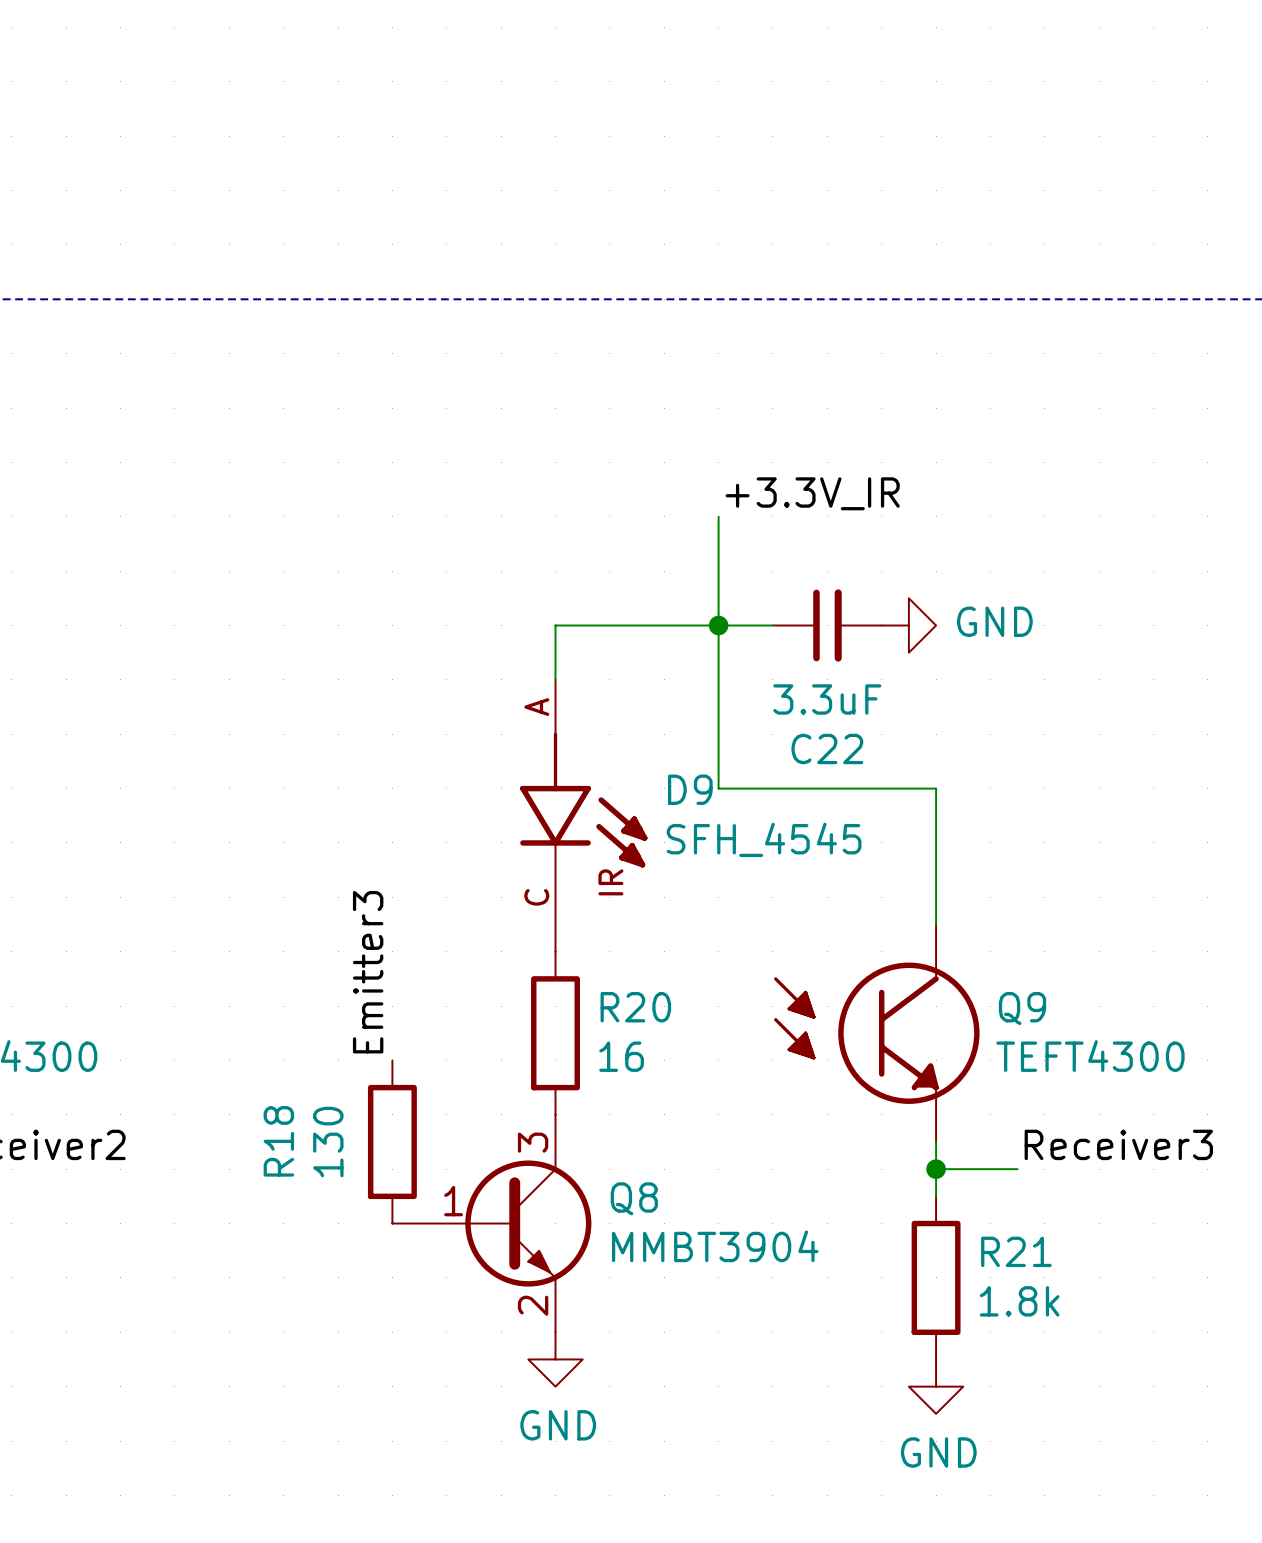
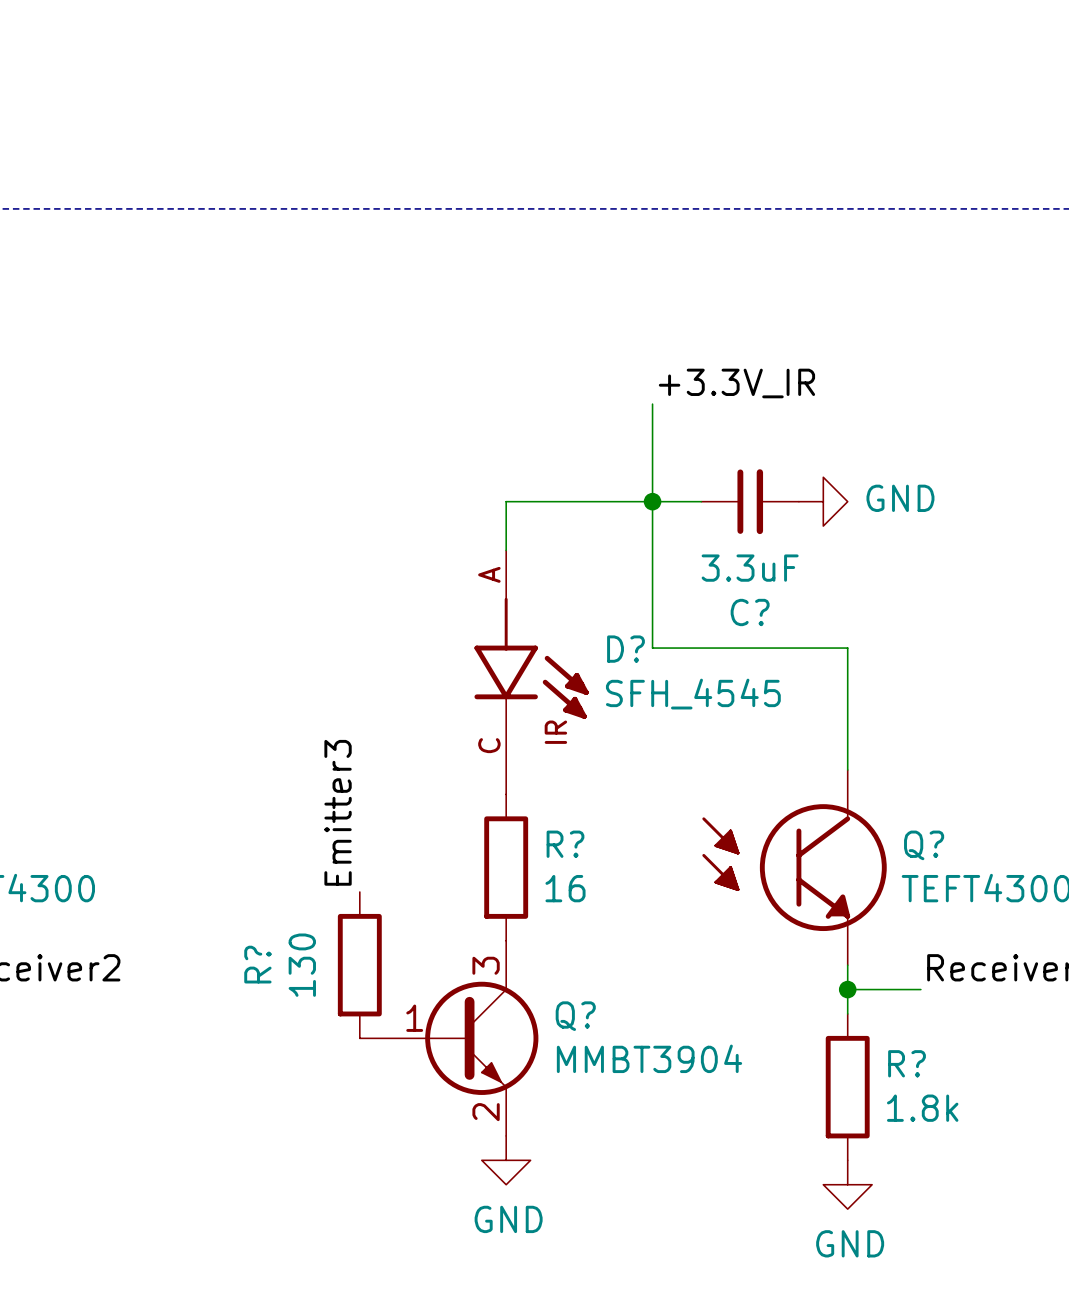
C22 name: C22 (827, 748) -> C? (750, 612)
D9 name: D9 (690, 789) -> D? (625, 649)
R20 name: R20 (635, 1007) -> R? (565, 844)
Q9 name: Q9 (1022, 1008) -> Q? (924, 845)
R18 name: R18 (278, 1141) -> R? (257, 964)
Q8 name: Q8 (634, 1198) -> Q? (575, 1016)
R21 name: R21 (1016, 1251) -> R? (907, 1063)

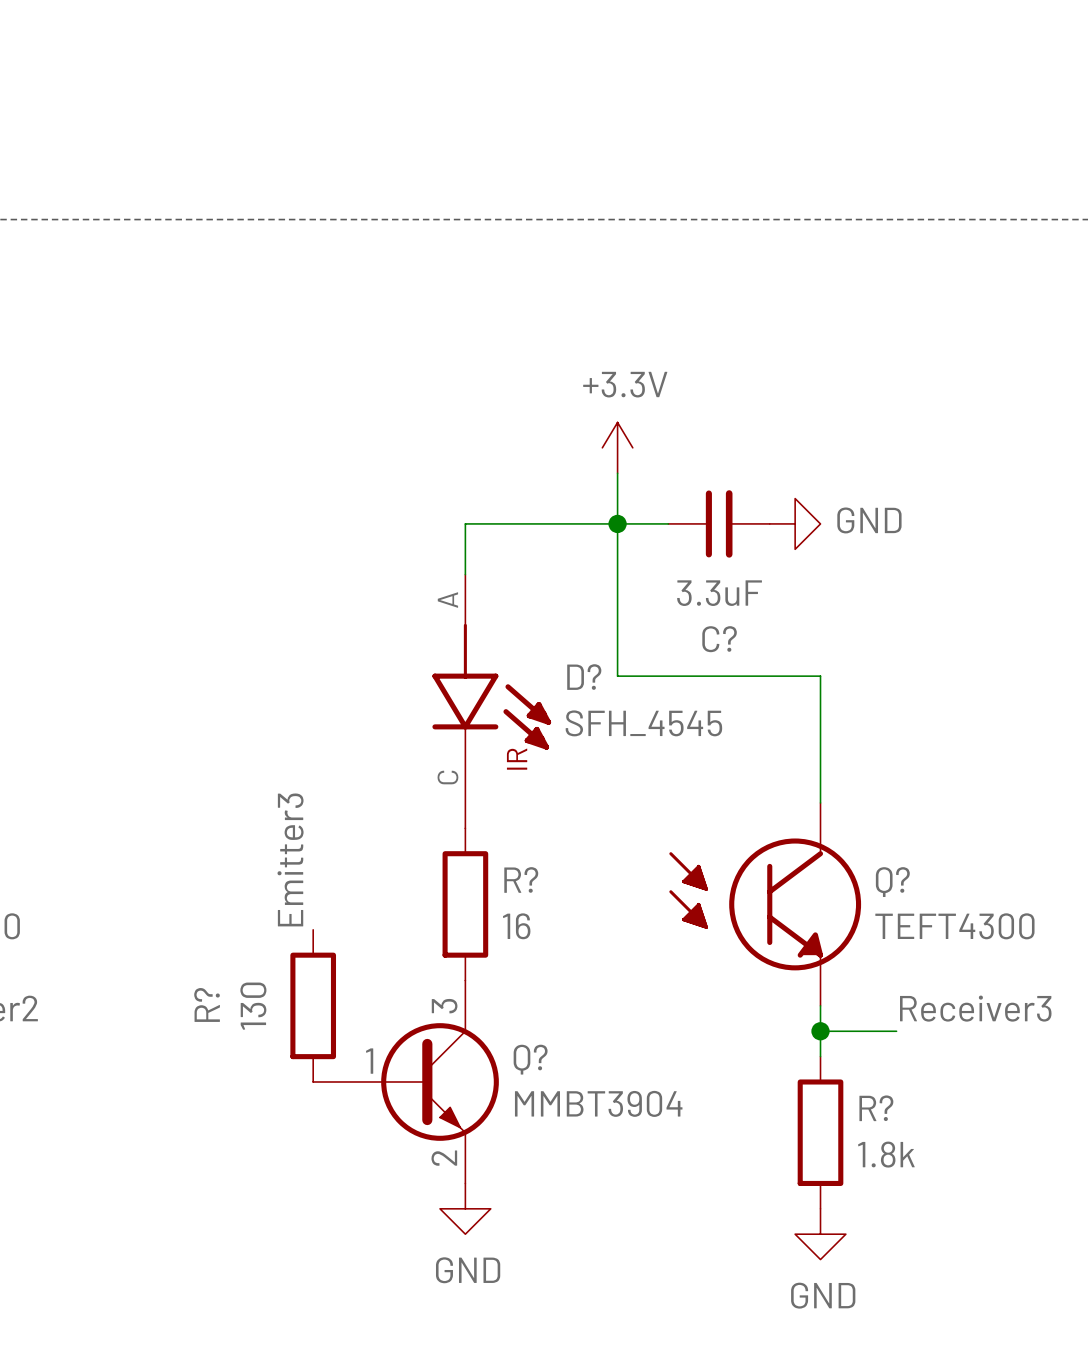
label: +3.3V_IR (736, 383) -> none
power symbol: none -> +3.3V (617, 447)

